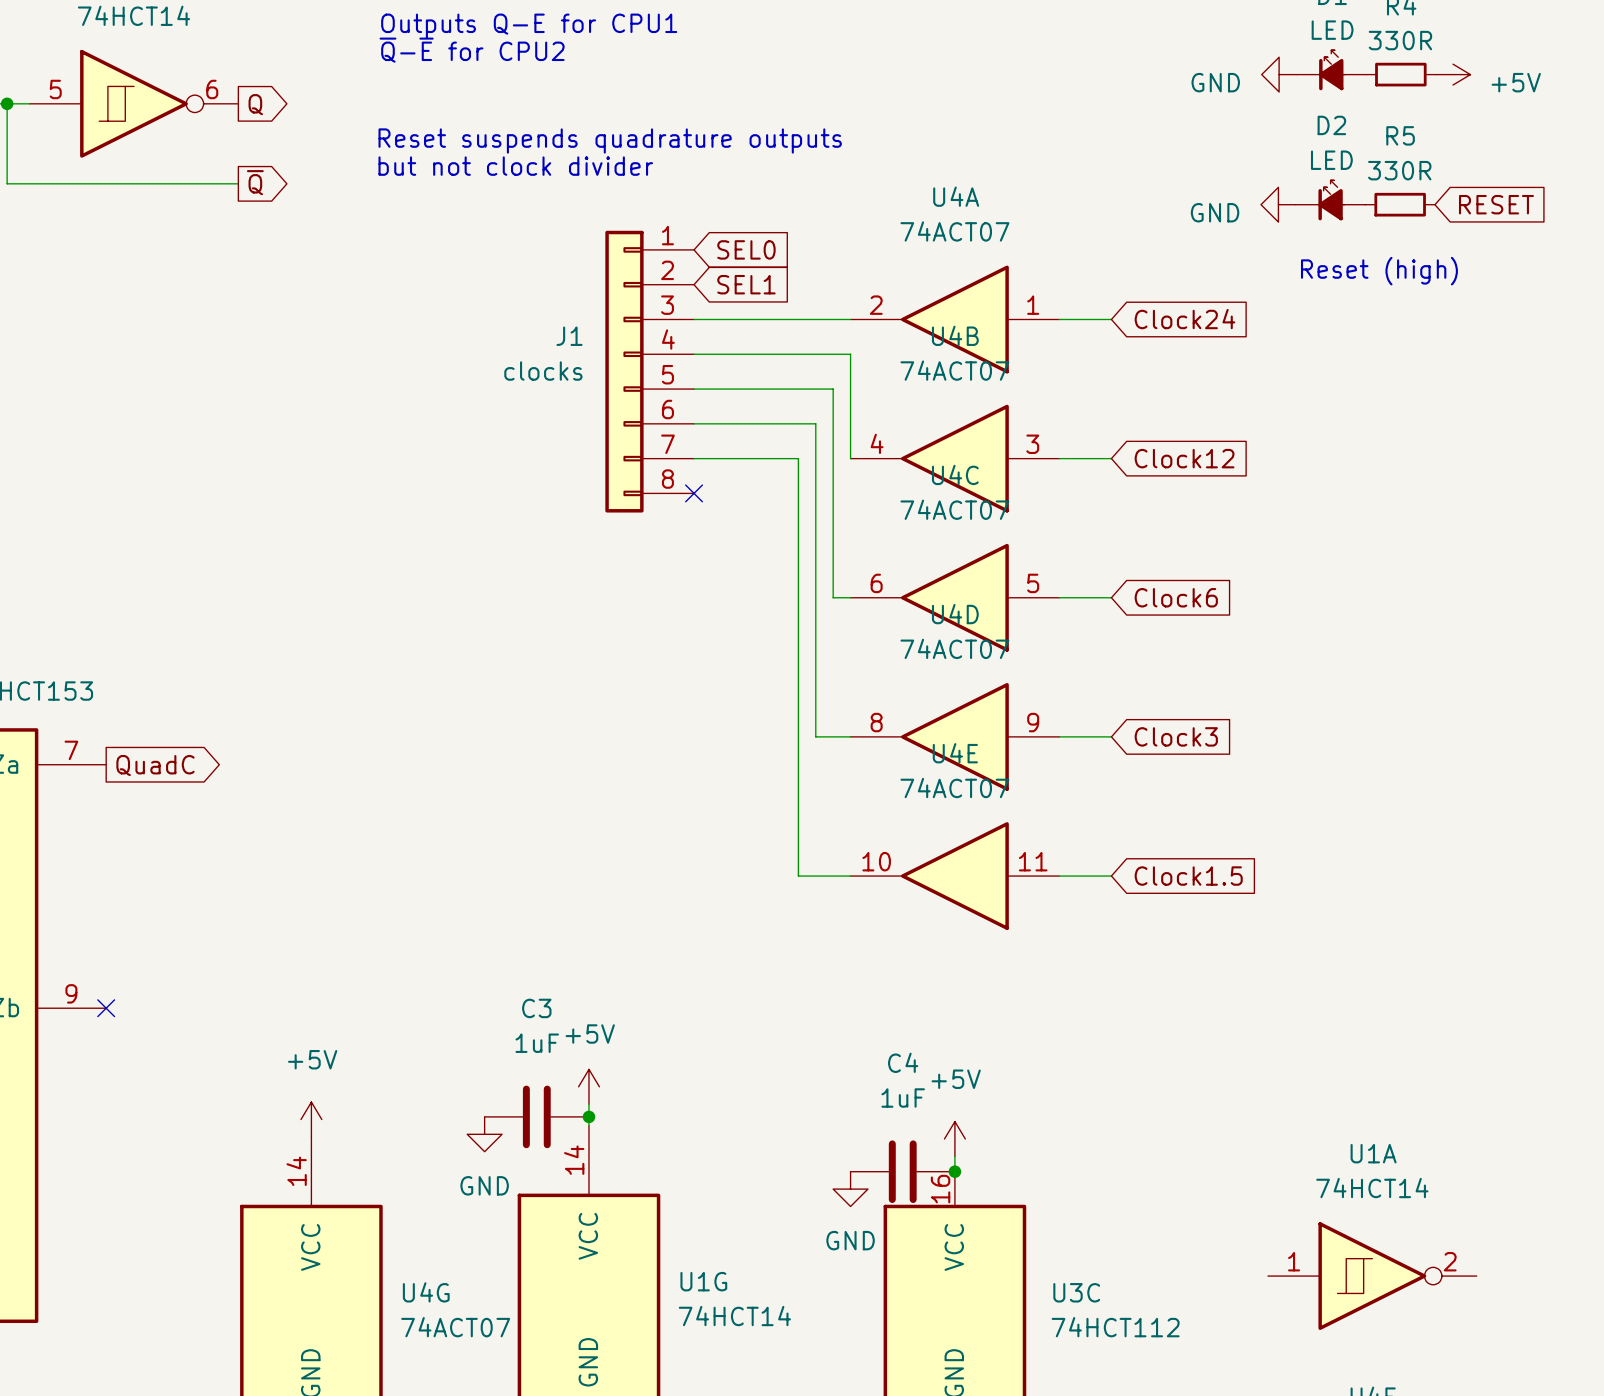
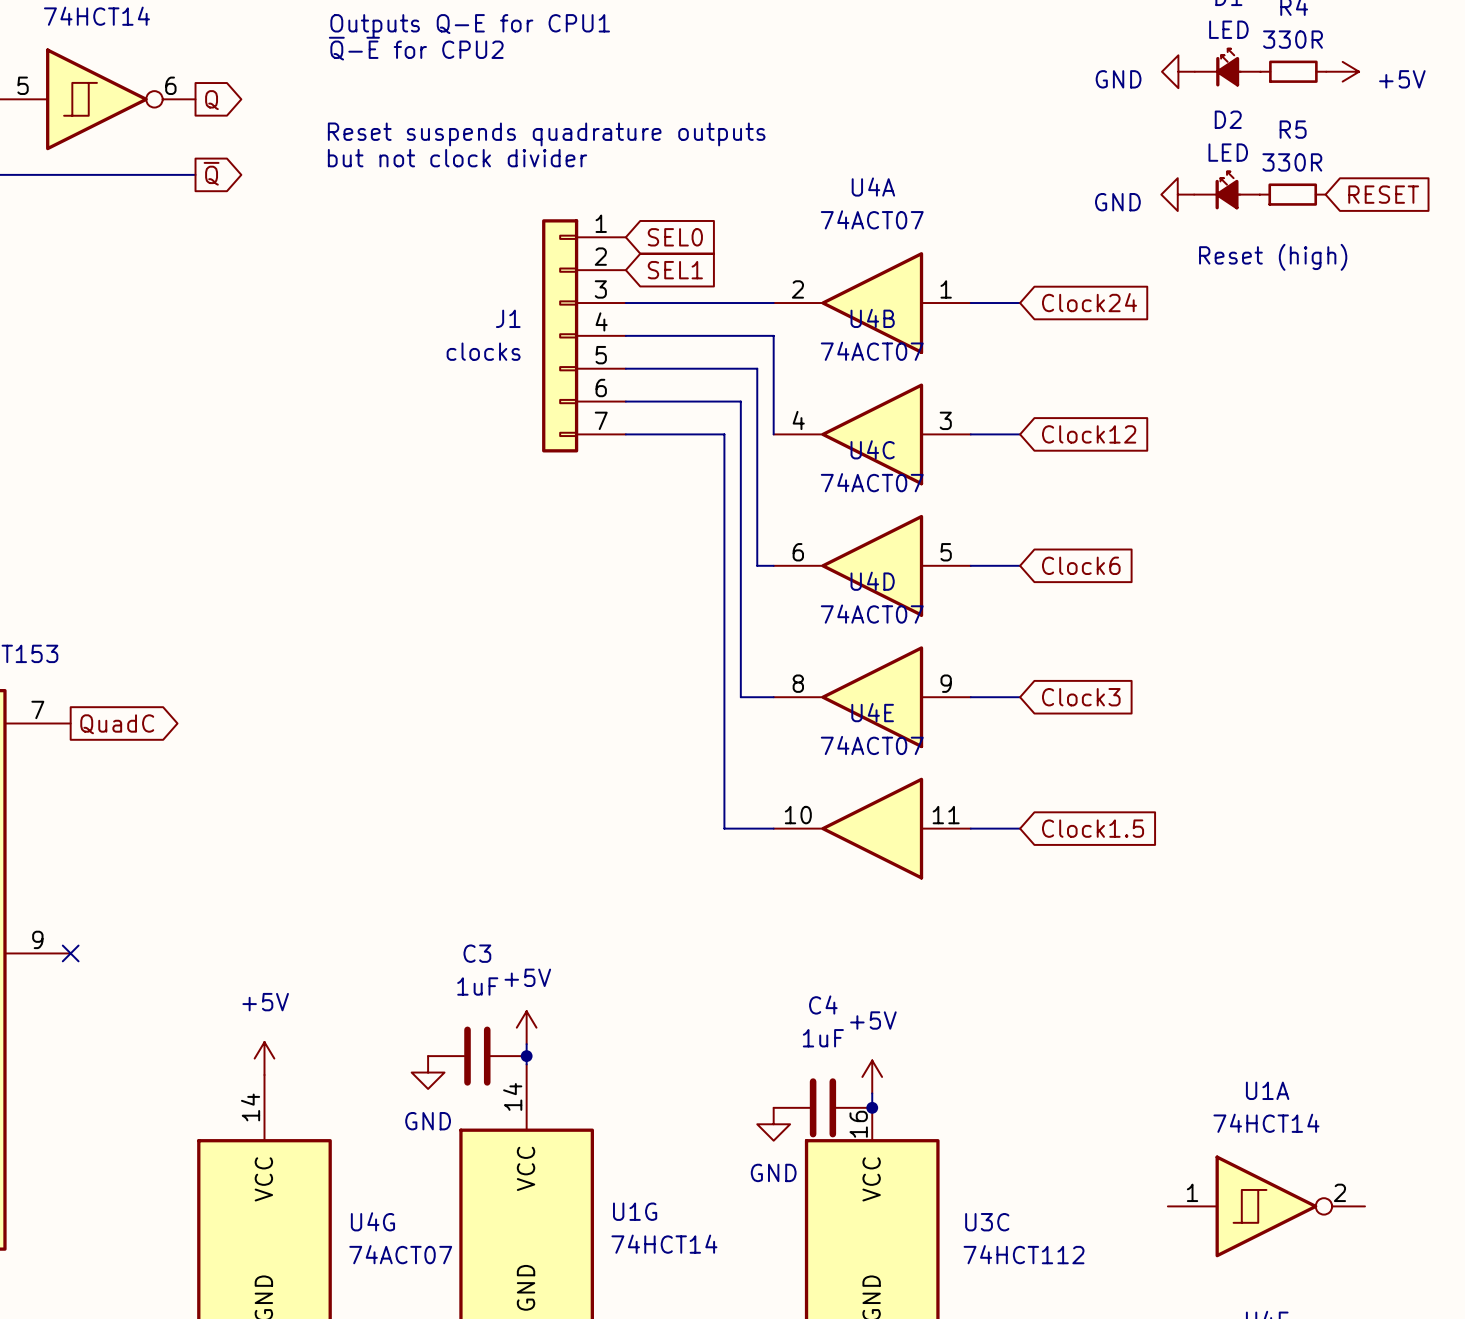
J1 symbol: [605, 230, 695, 513] -> [542, 219, 626, 453]
no-connect mark: (694, 493) -> none

